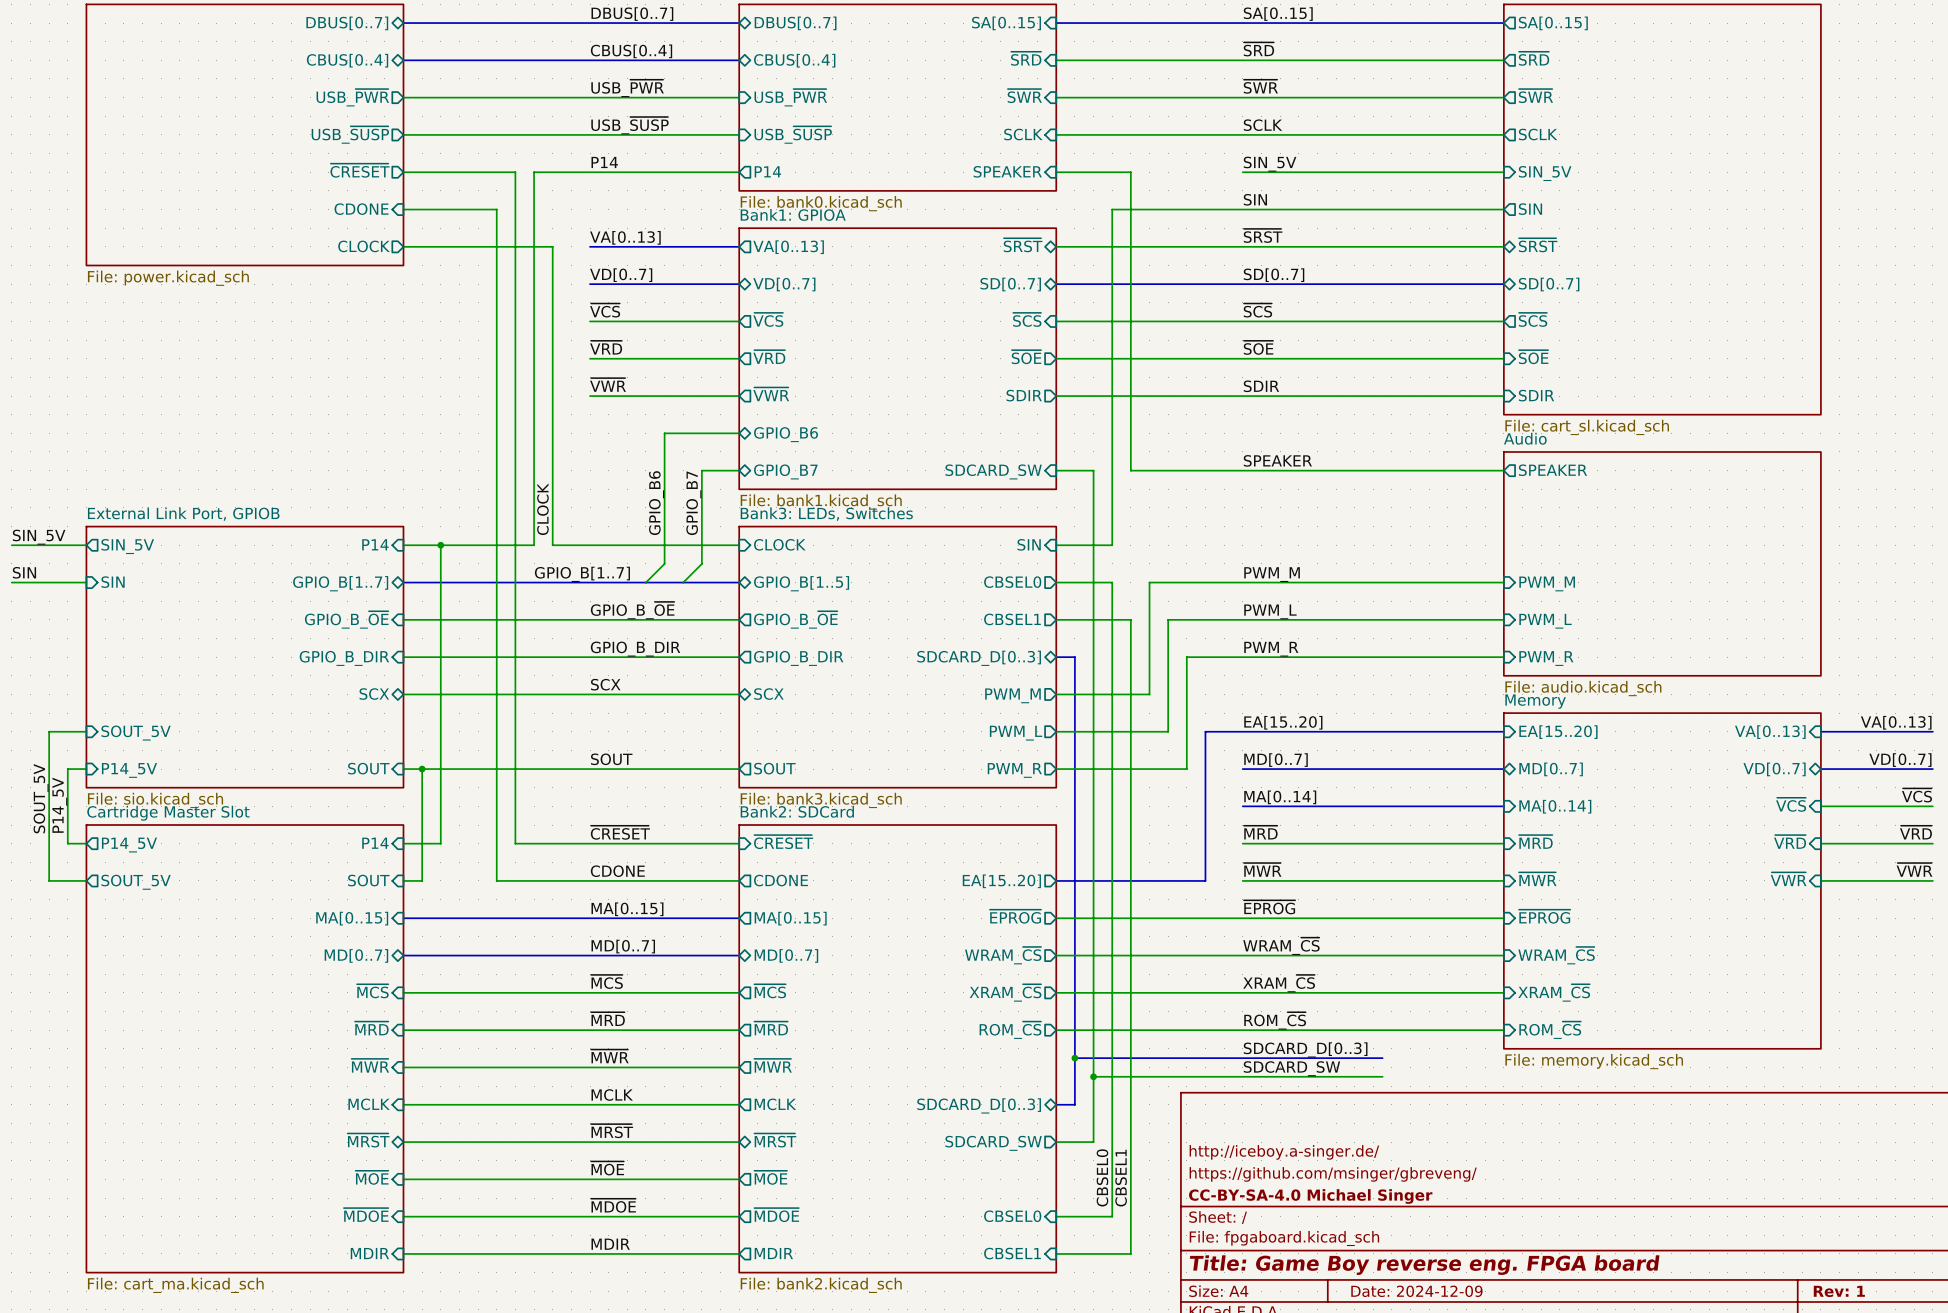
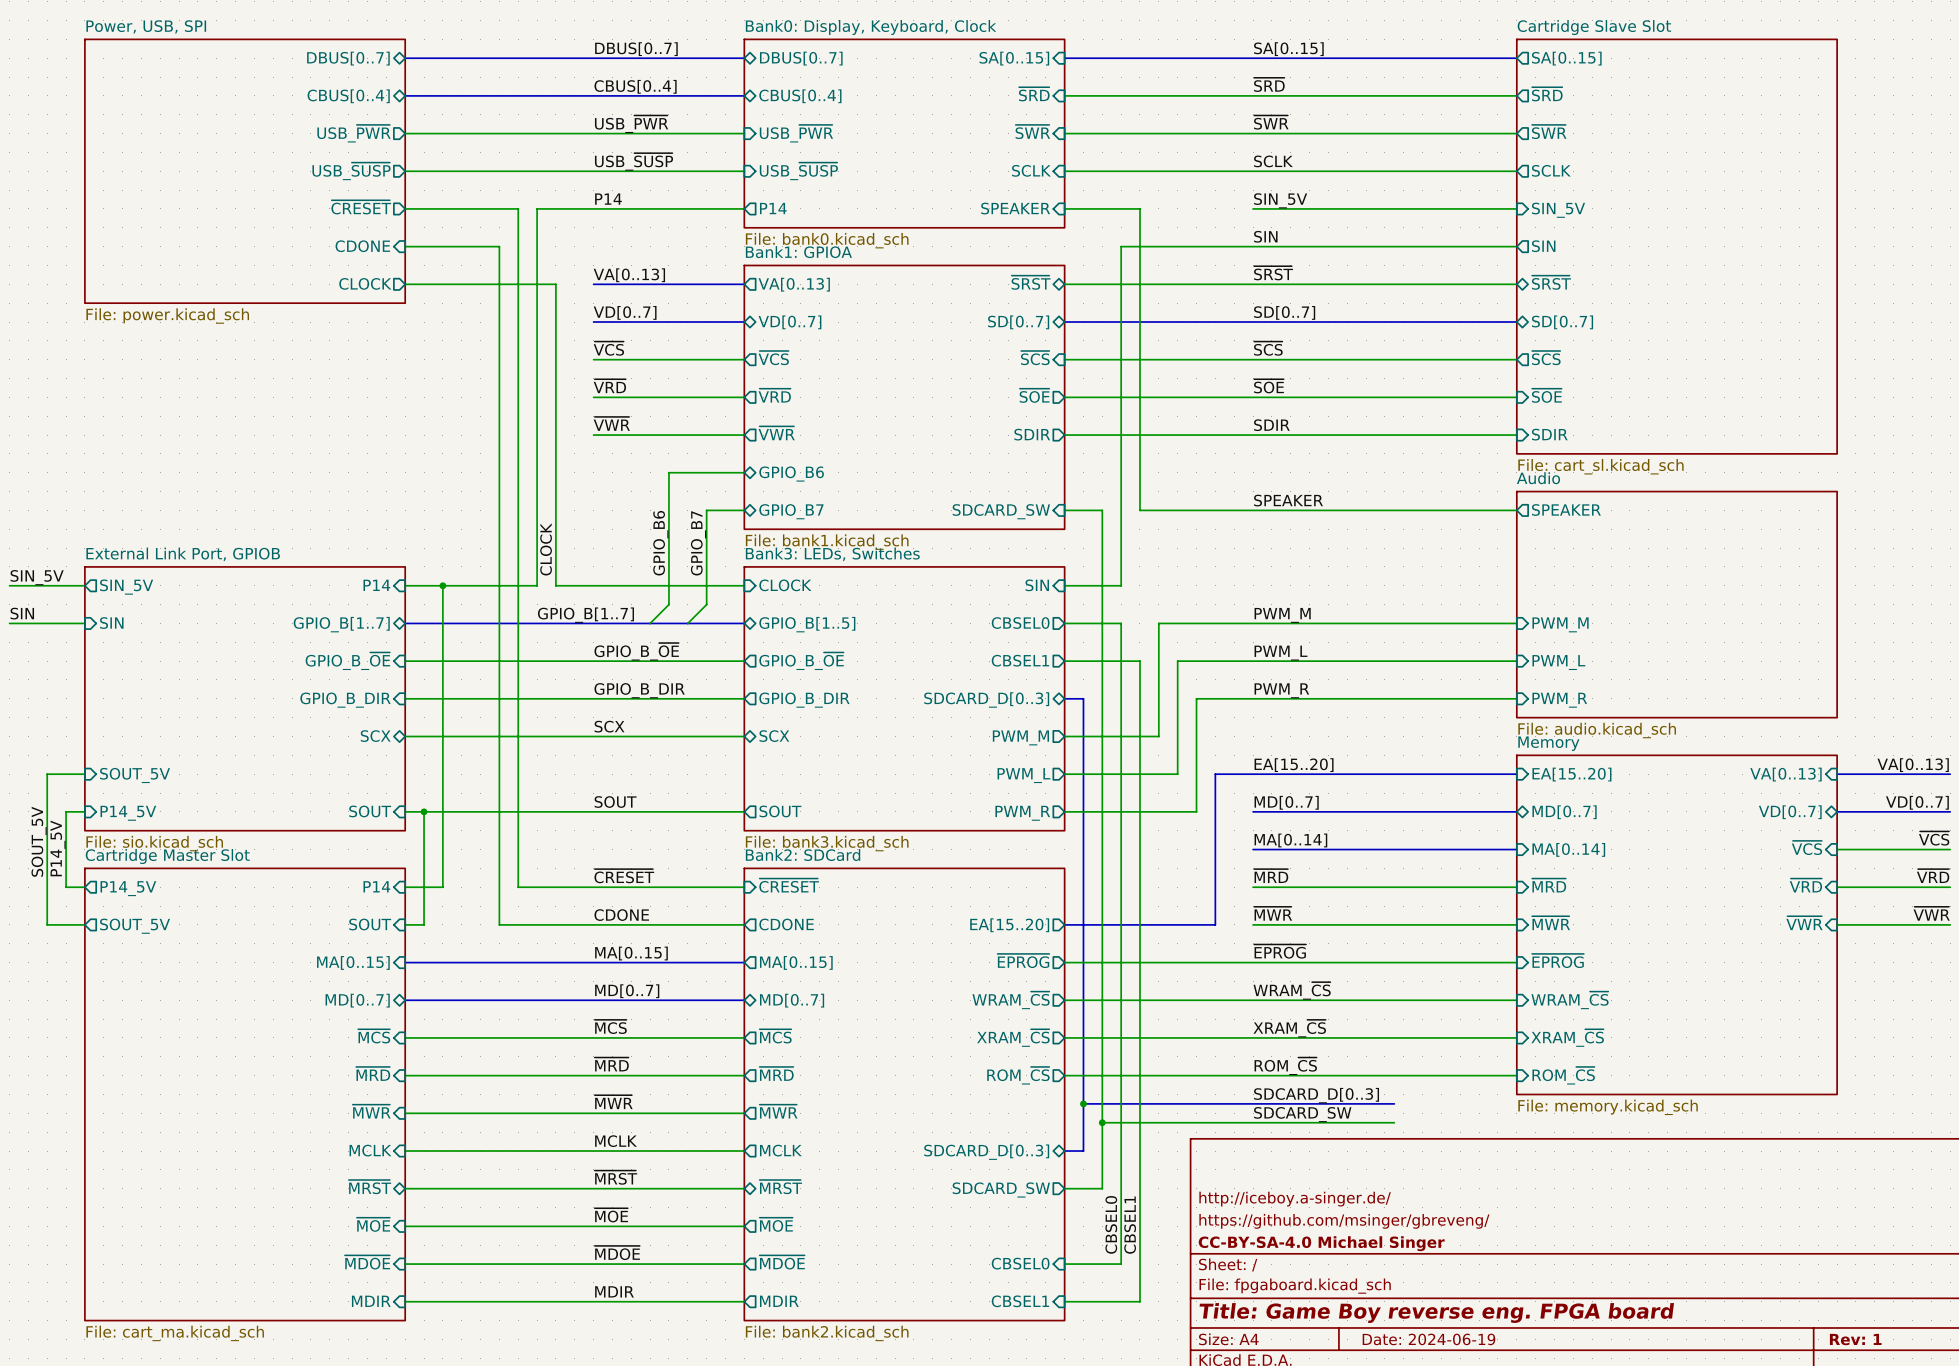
title block: Date: 2024-12-09 (1416, 1291) -> Date: 2024-06-19 (1428, 1339)

